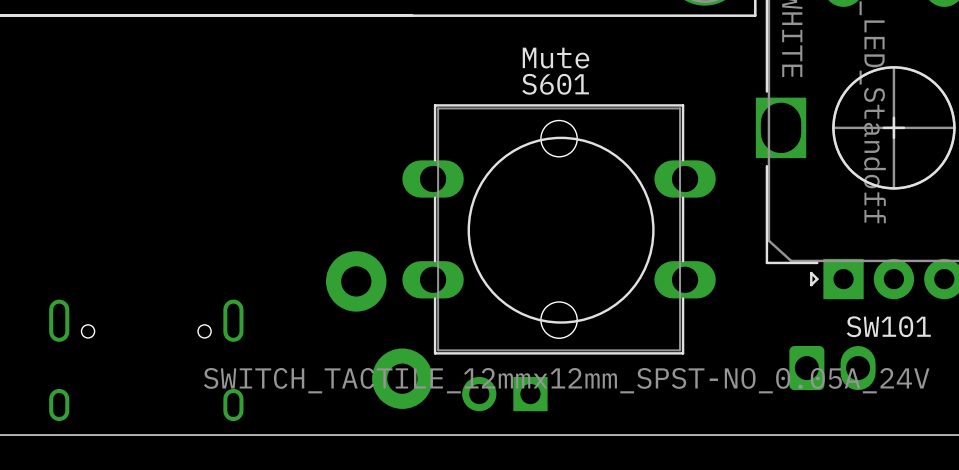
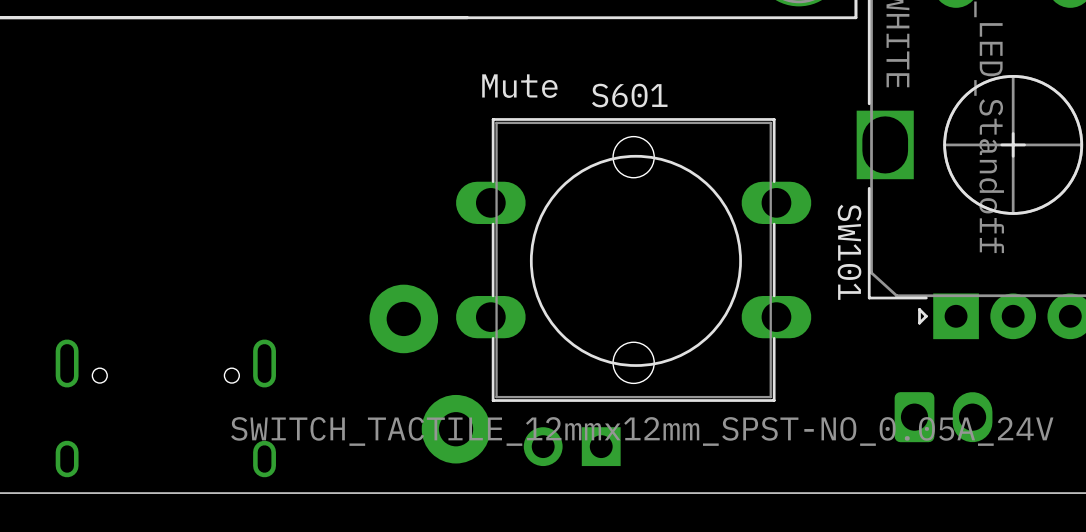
text position: Mute (555, 58) -> Mute (519, 86)
SW101 name rotation: 0° (888, 326) -> 90° clockwise (849, 252)
SW101 name position: SW101 (888, 326) -> SW101 (849, 252)

